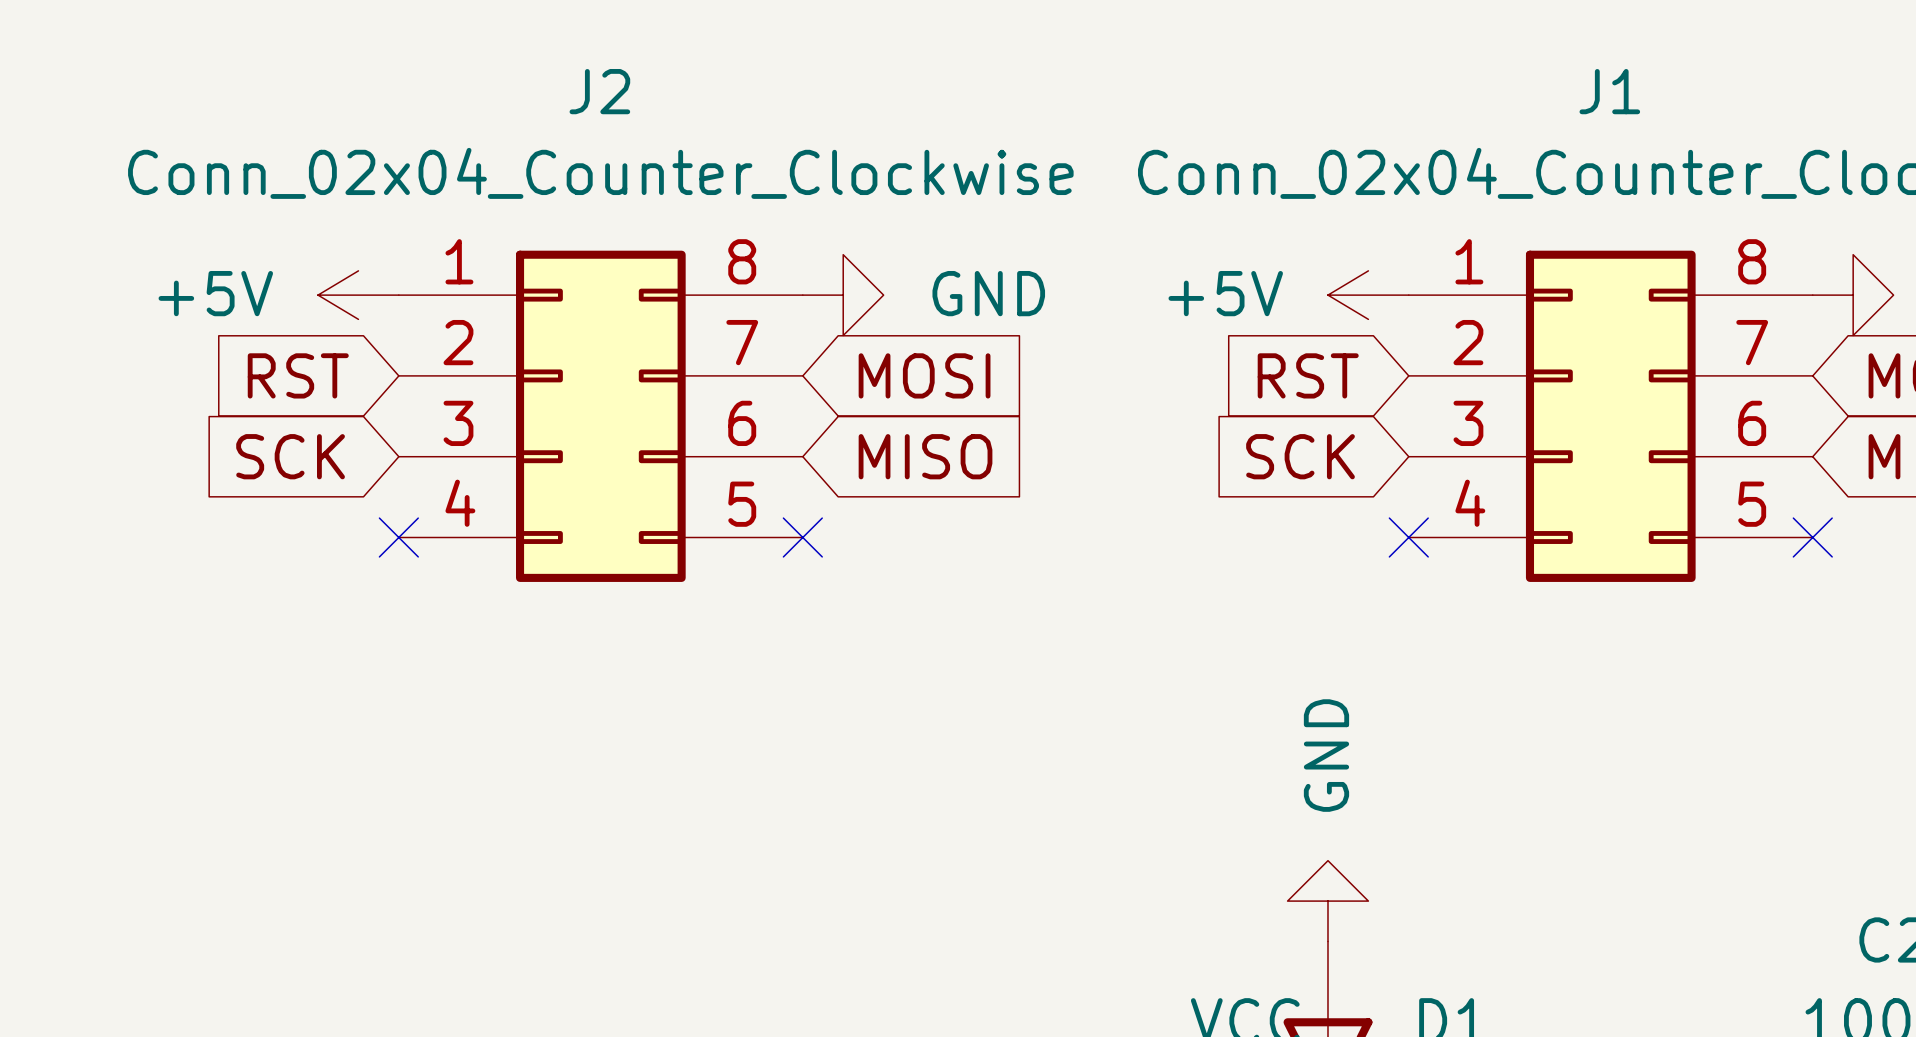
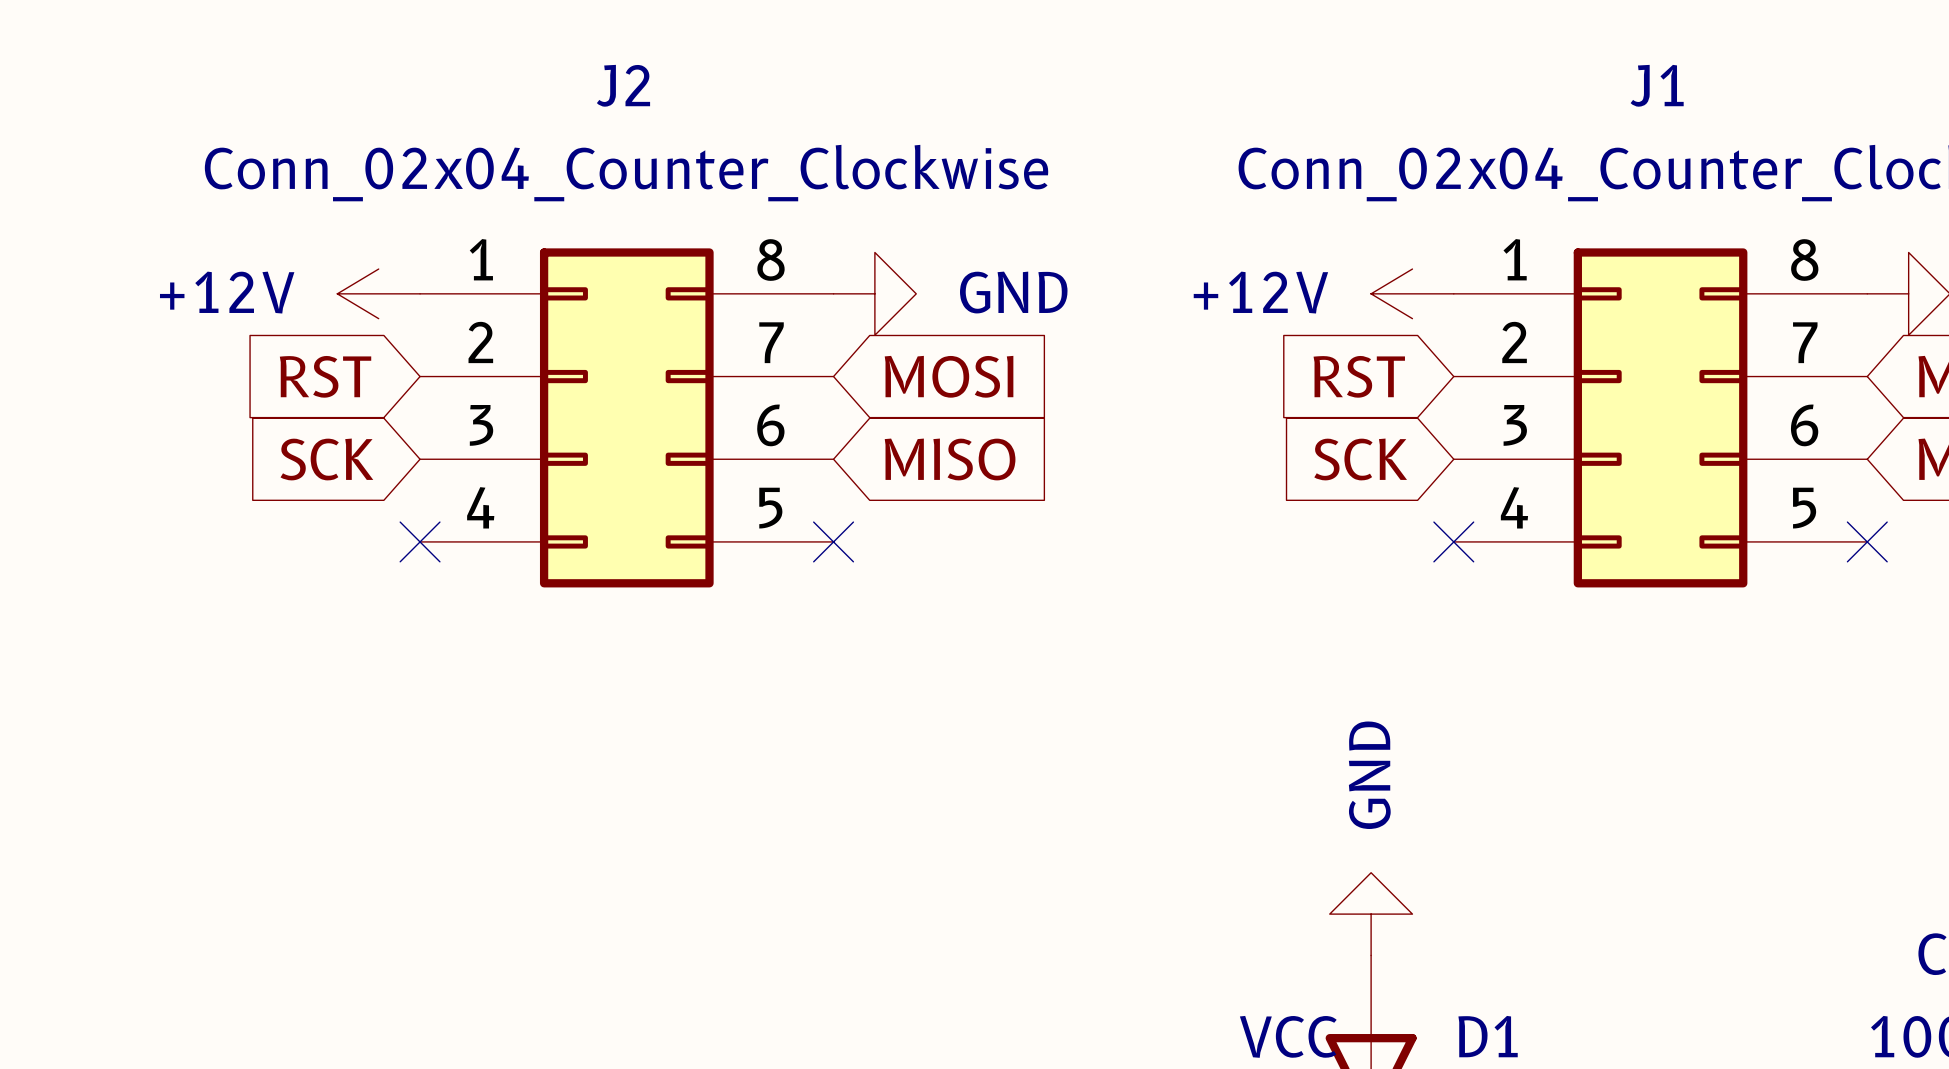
power symbol: +5V (358, 295) -> +12V (378, 293)
power symbol: +5V (1368, 295) -> +12V (1412, 293)

